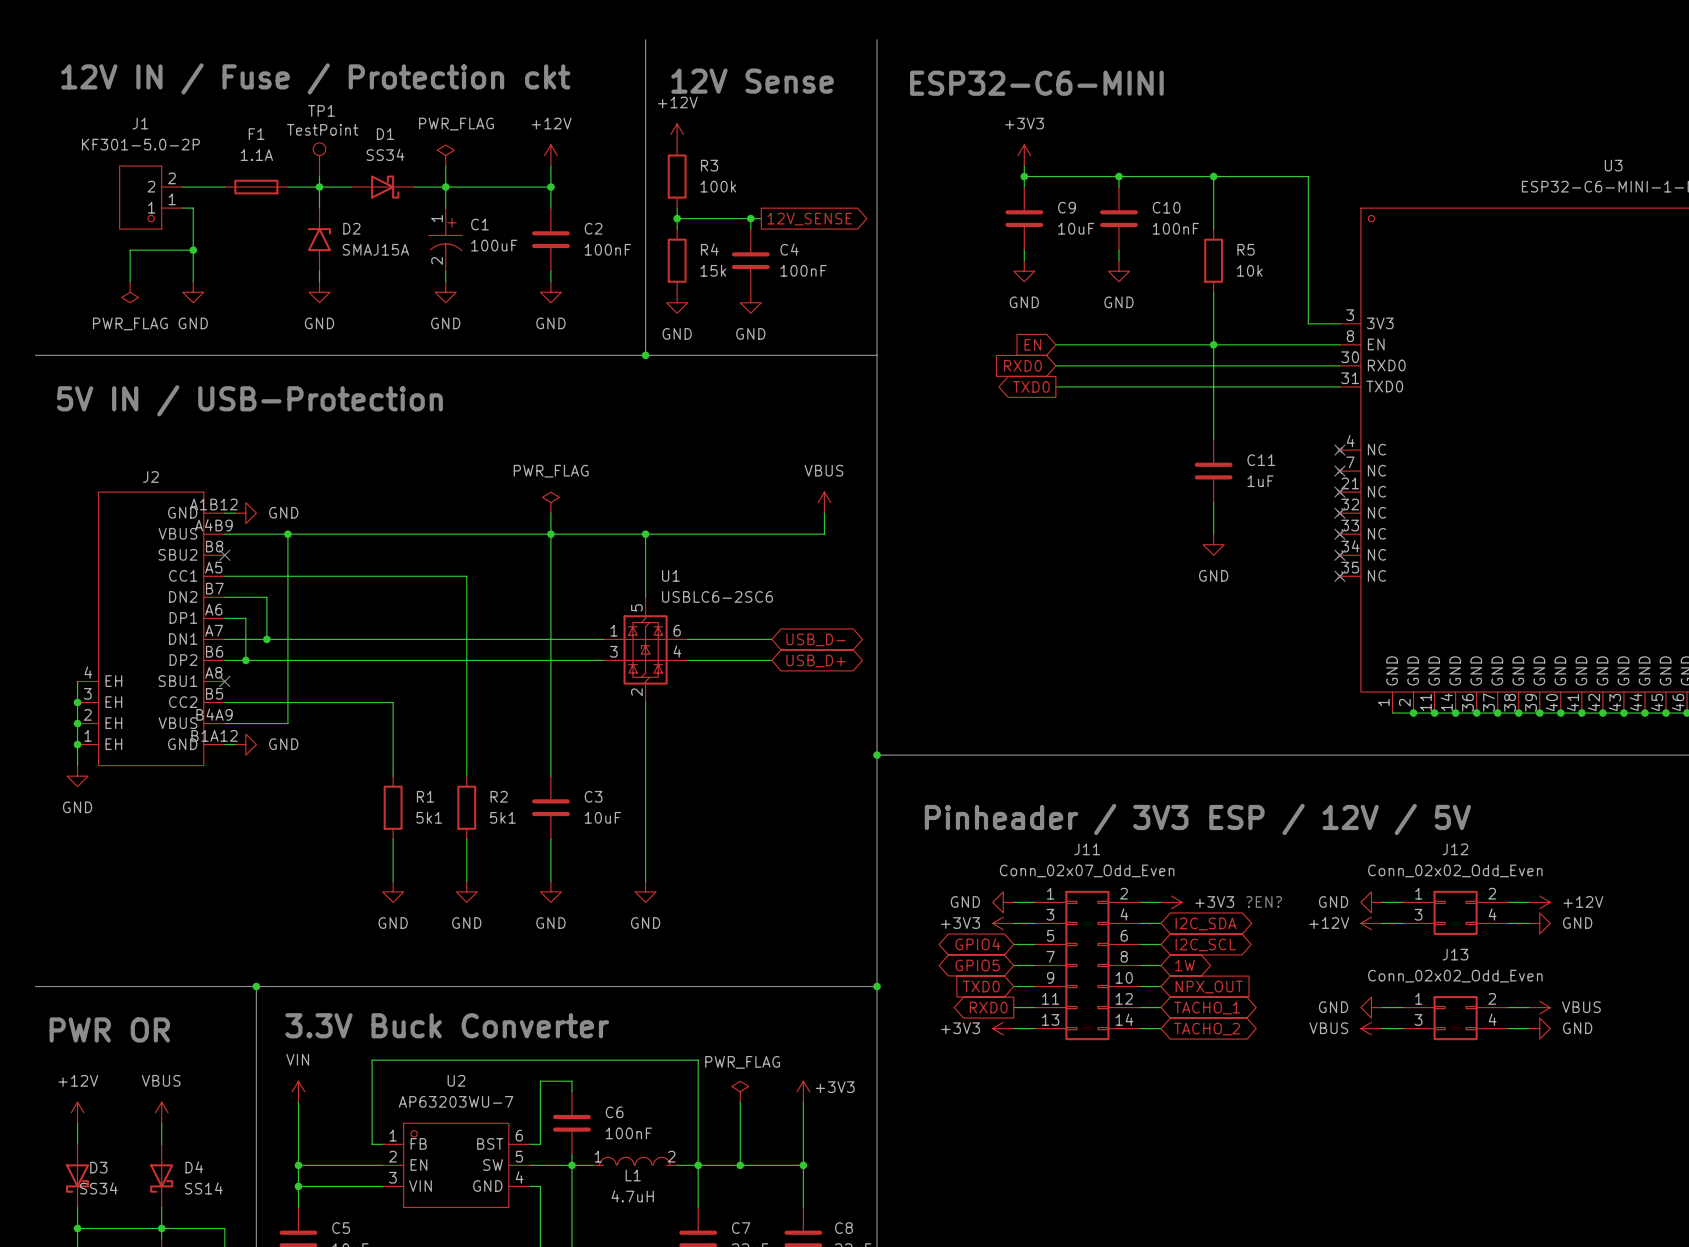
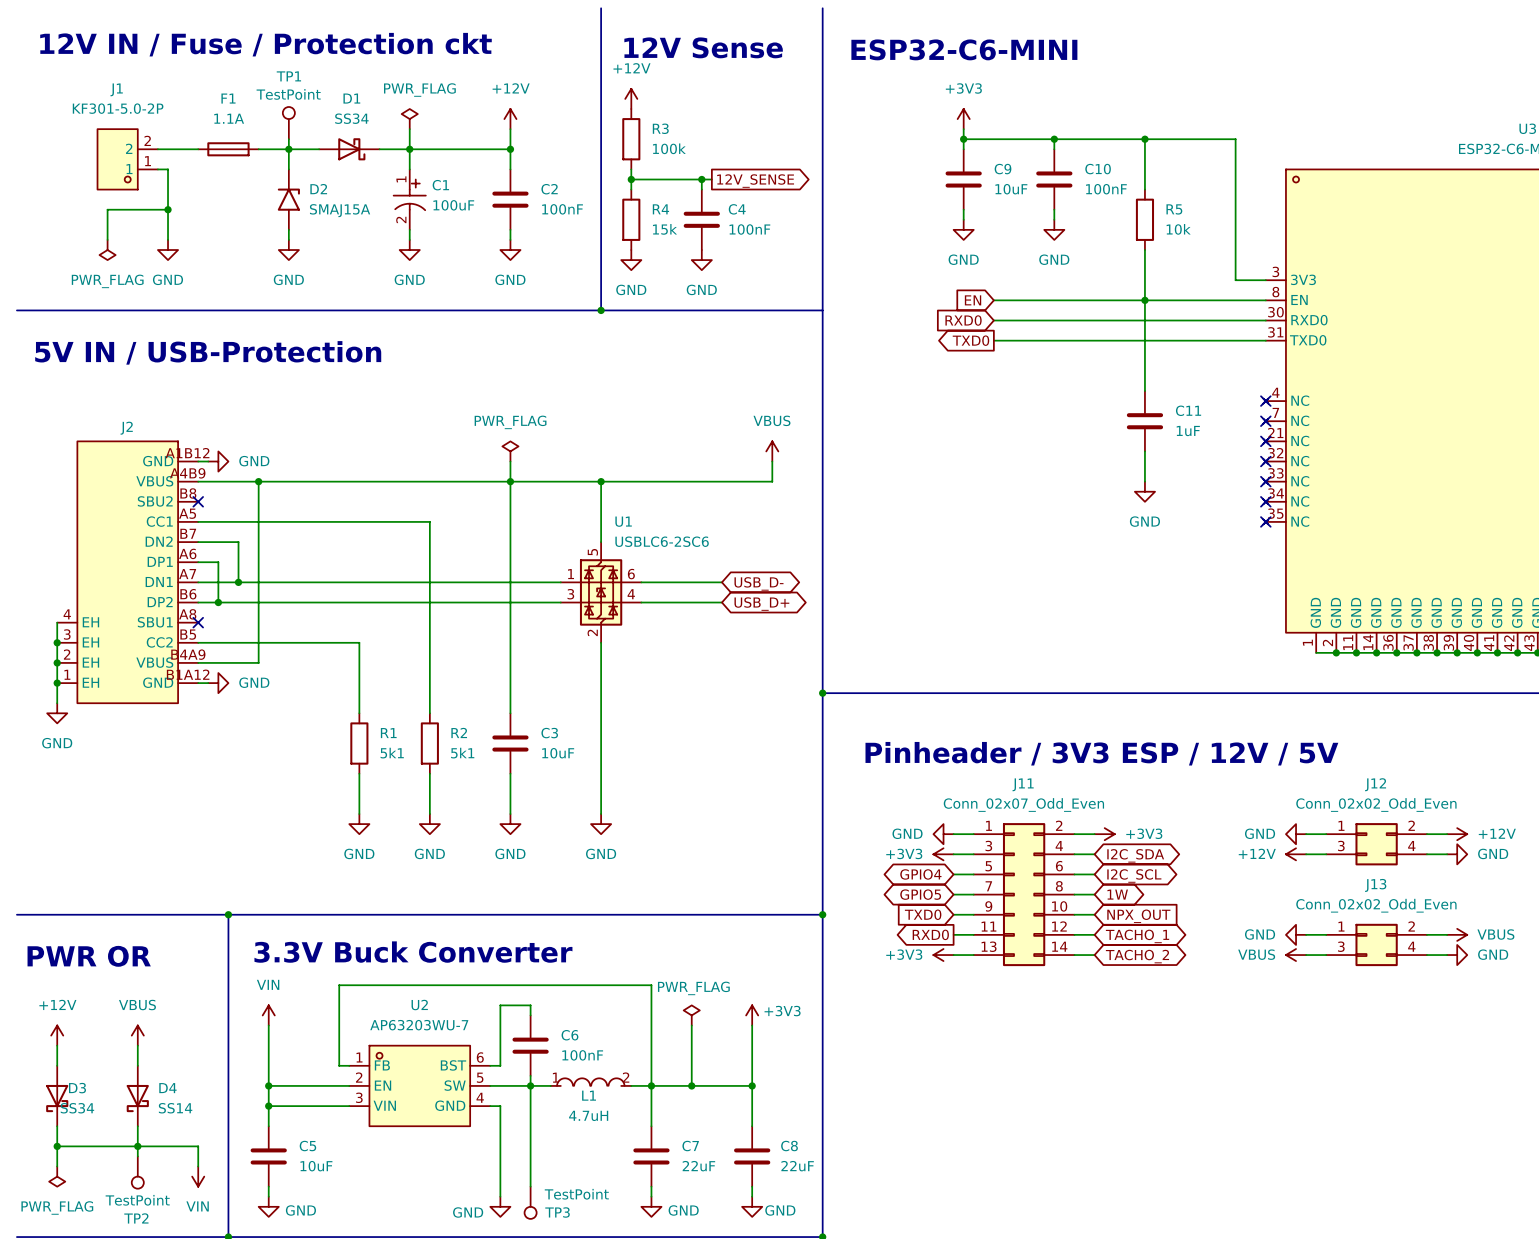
text: ?EN? (1264, 902) -> none

